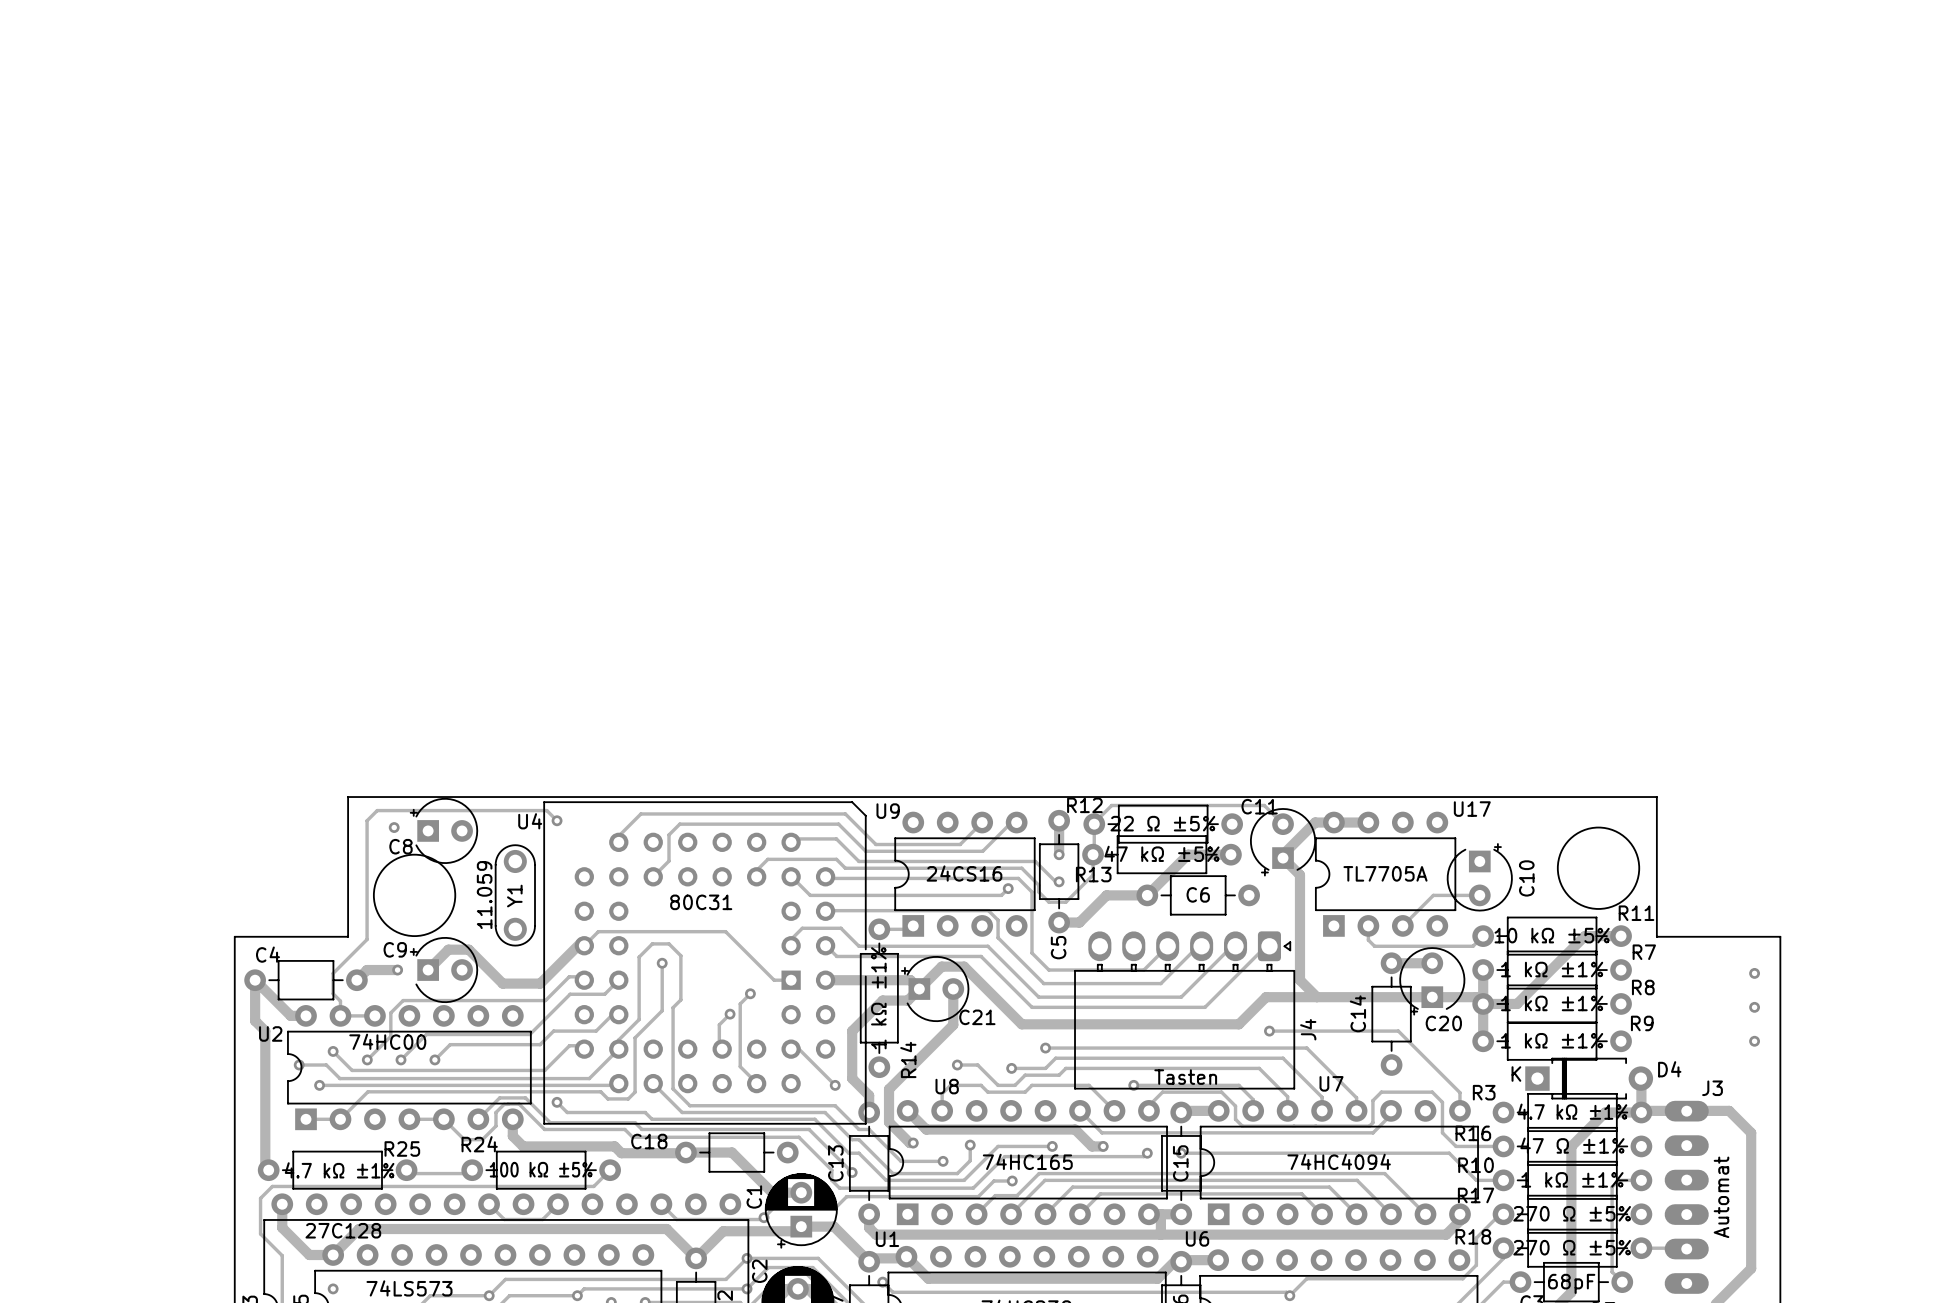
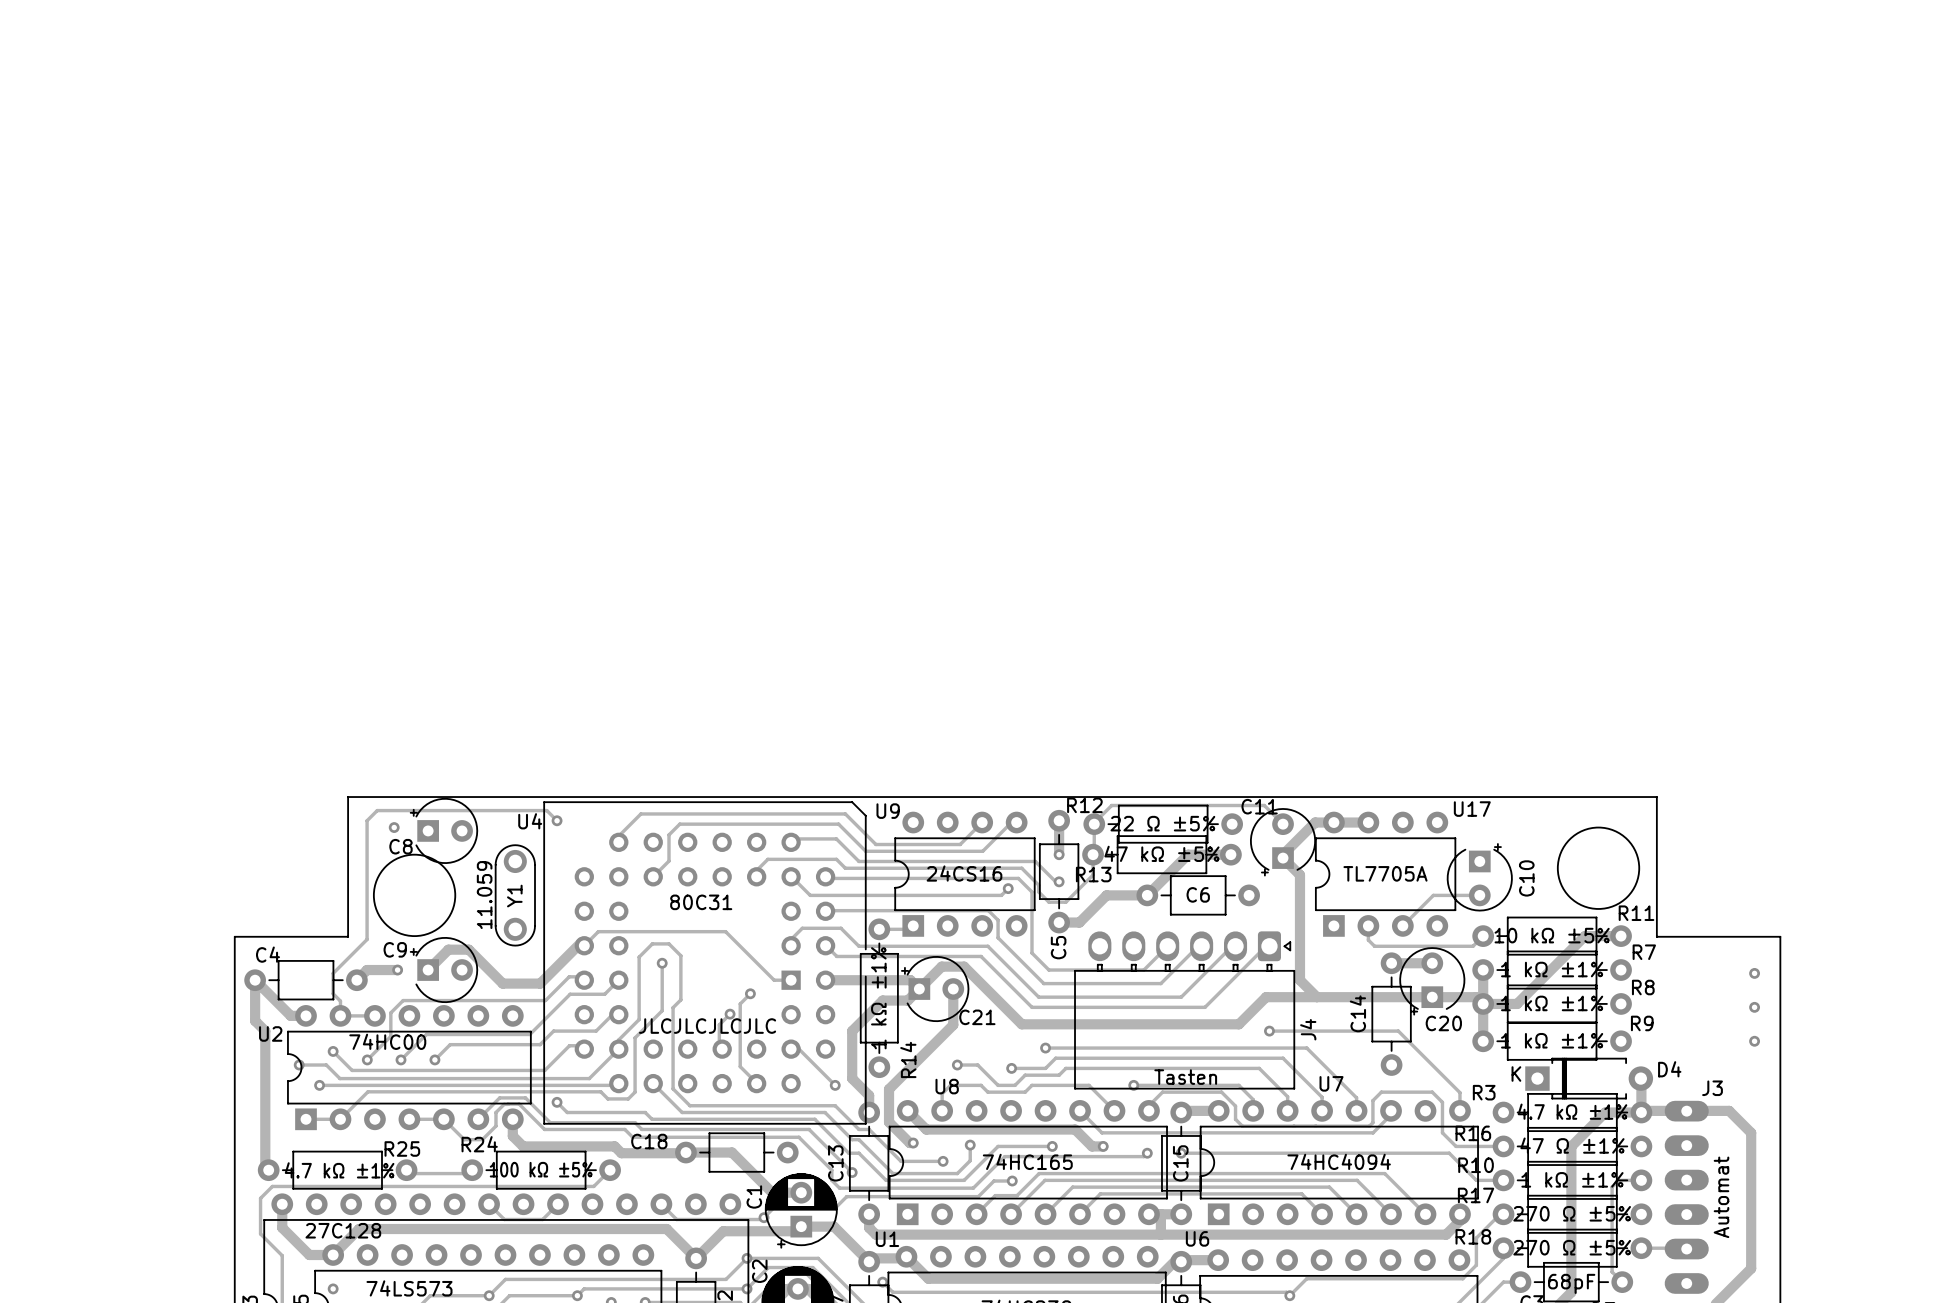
text: none -> JLCJLCJLCJLC (707, 1026)

